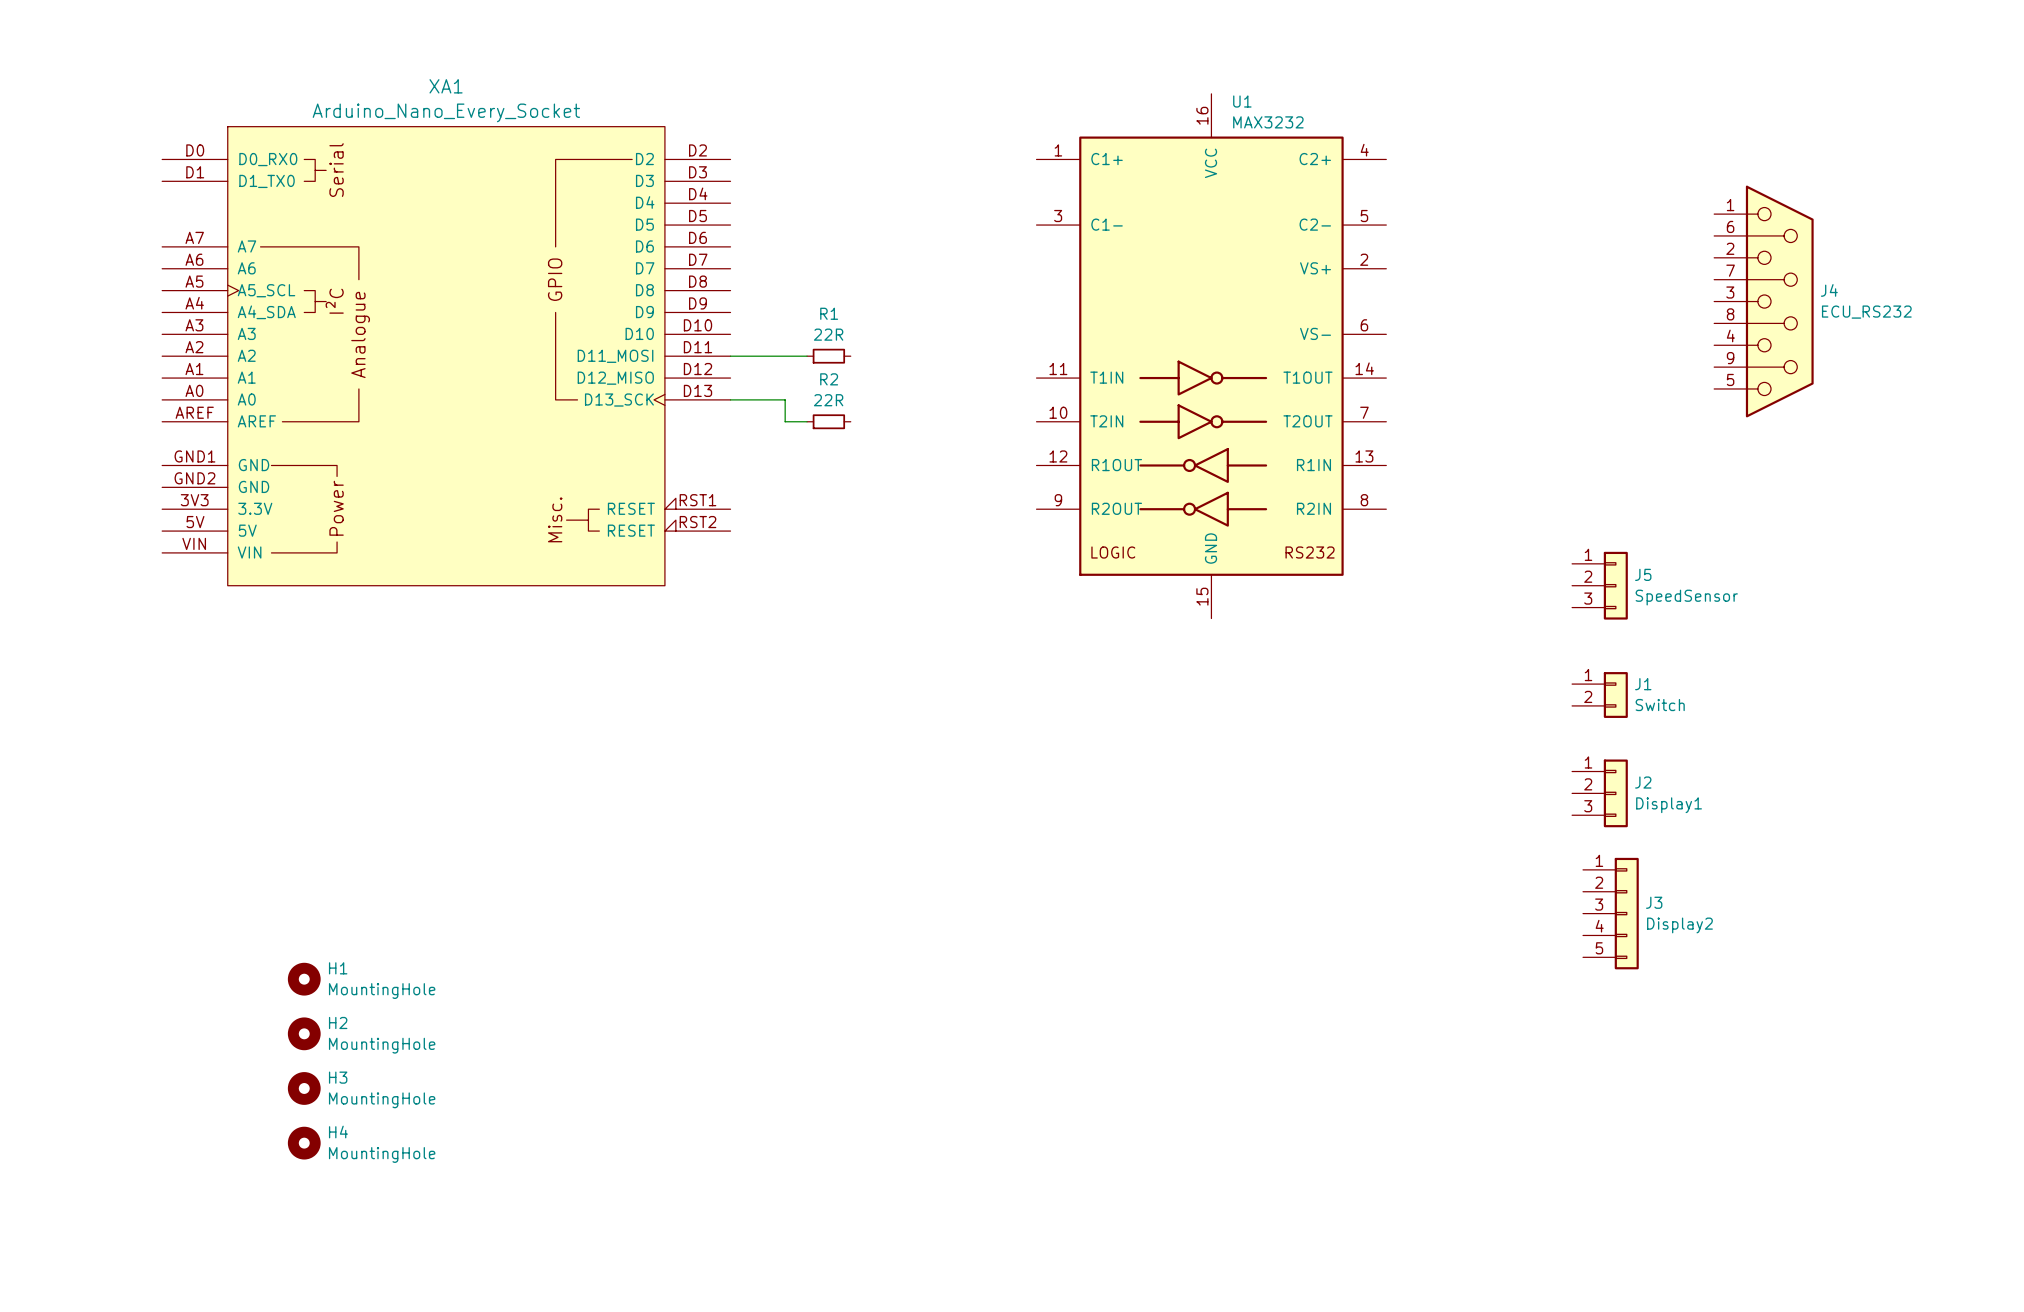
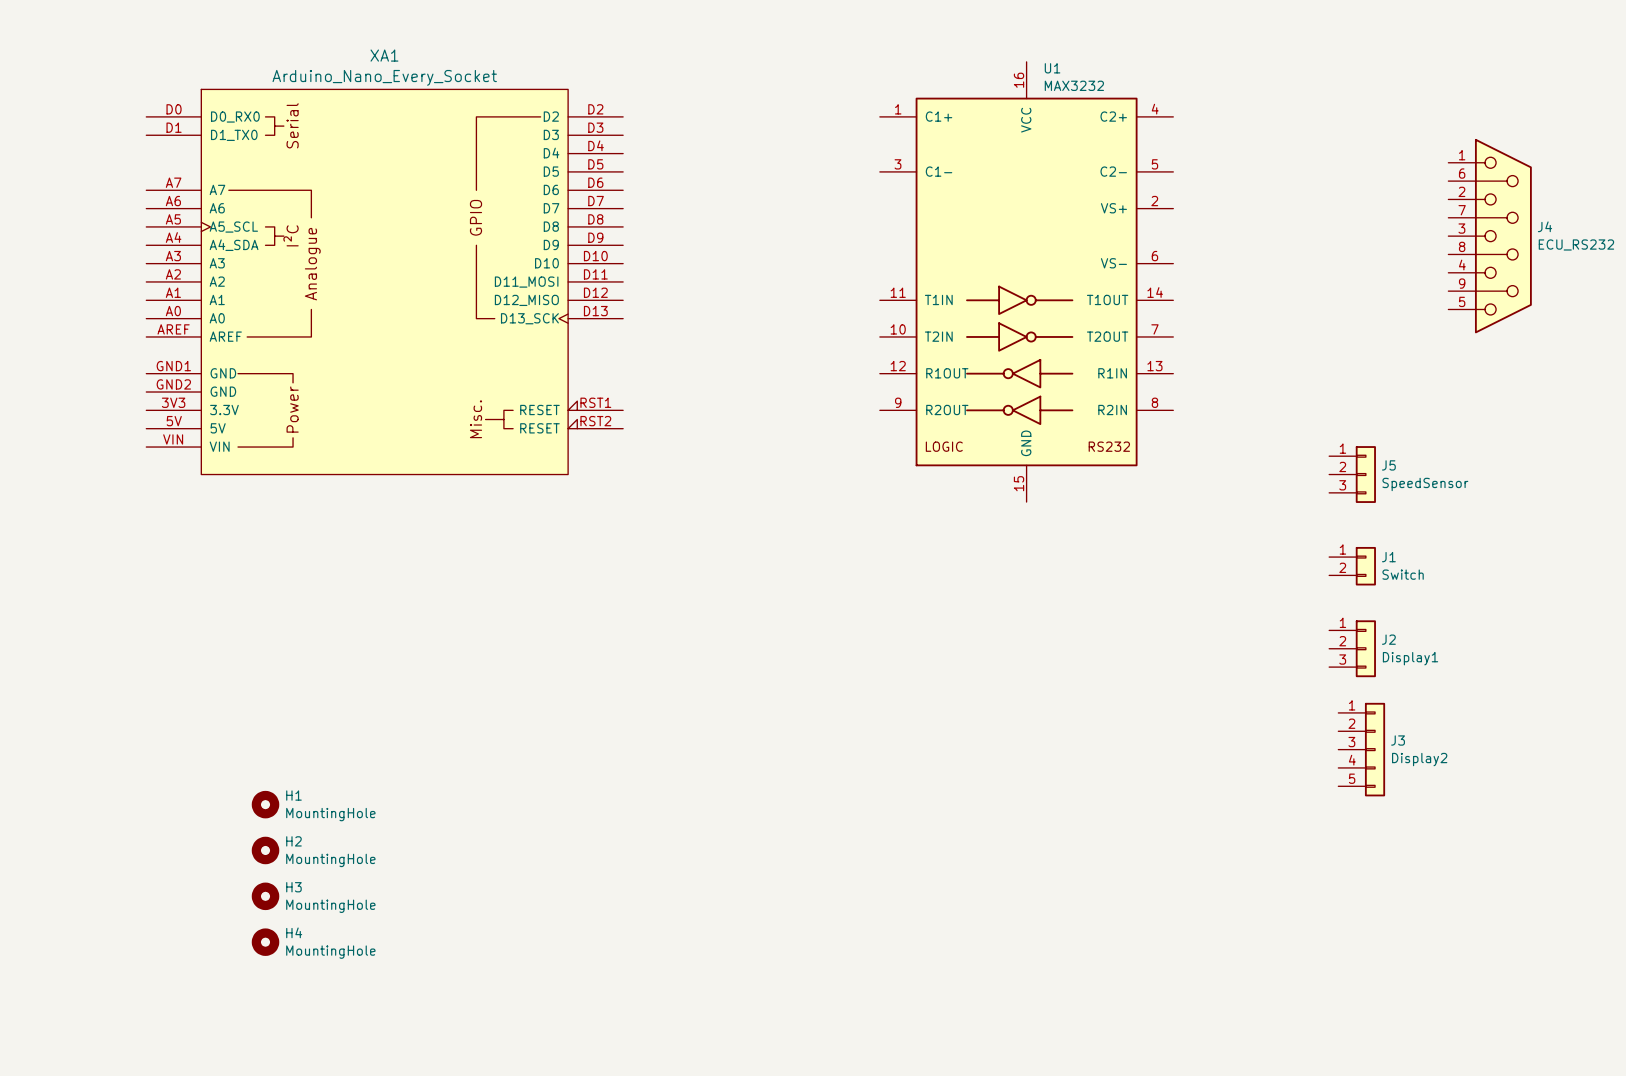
wire: (730, 356) (807, 356) -> none
R1: 22R (828, 356) -> none
wire: (730, 399) (785, 399) (785, 421) (807, 421) -> none
R2: 22R (828, 421) -> none

